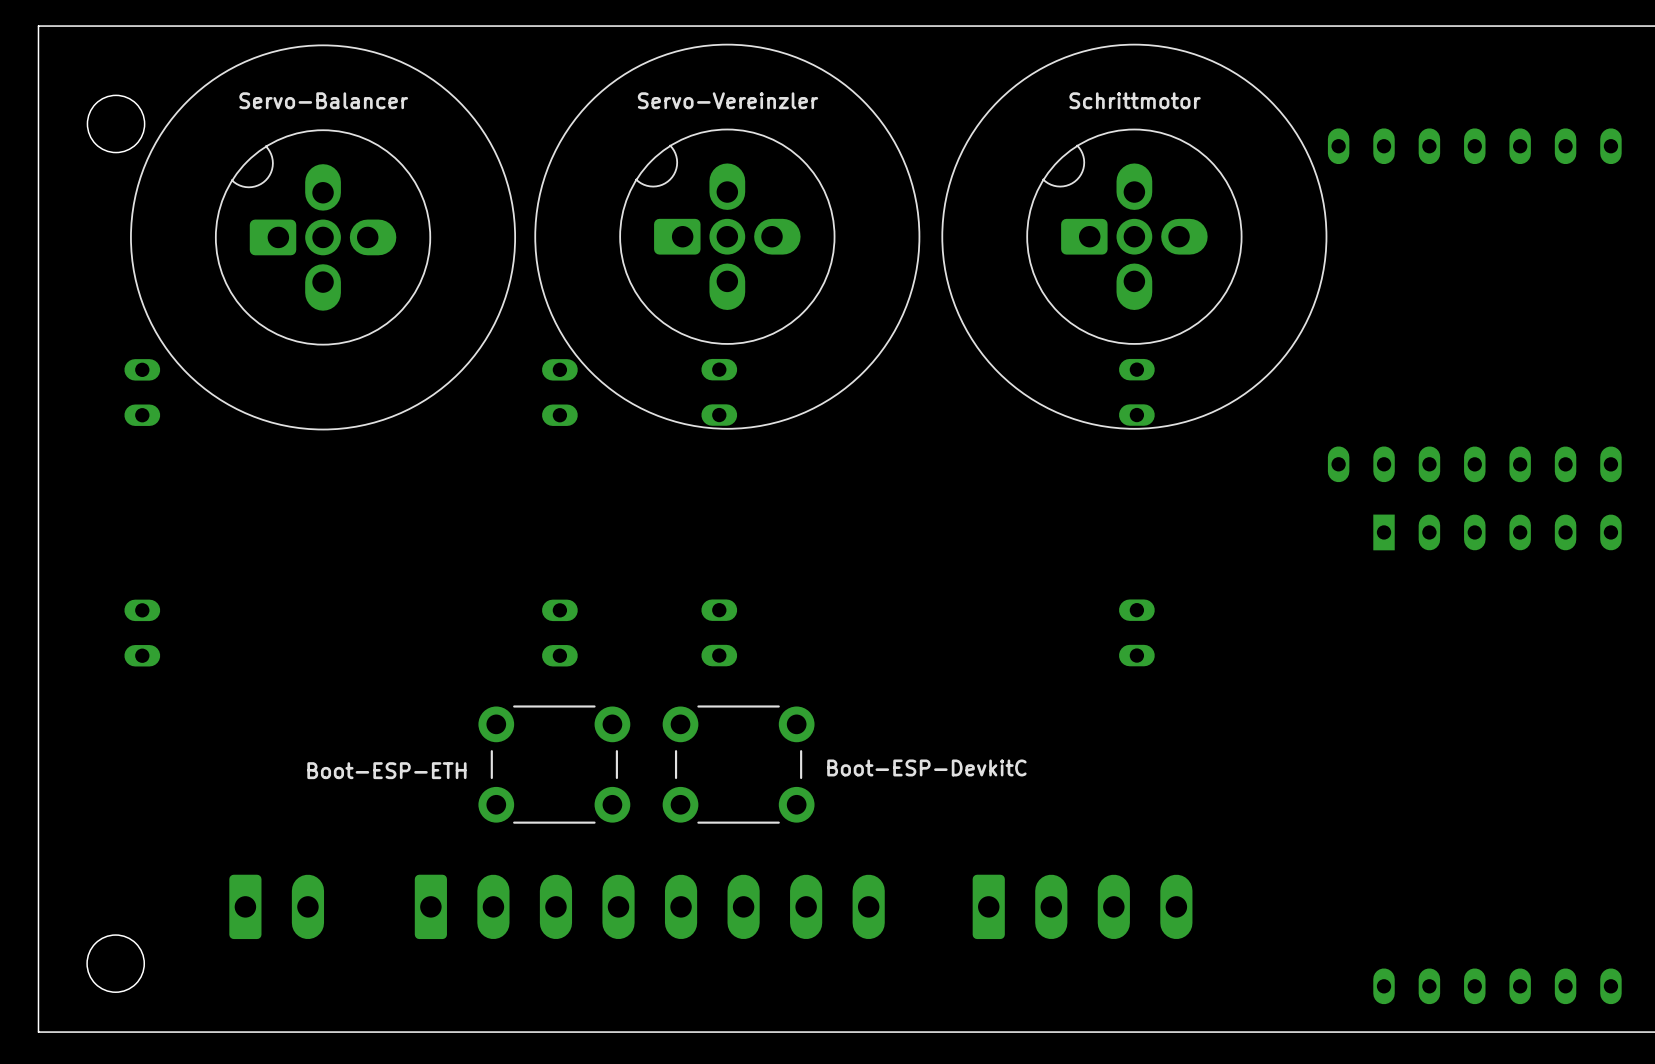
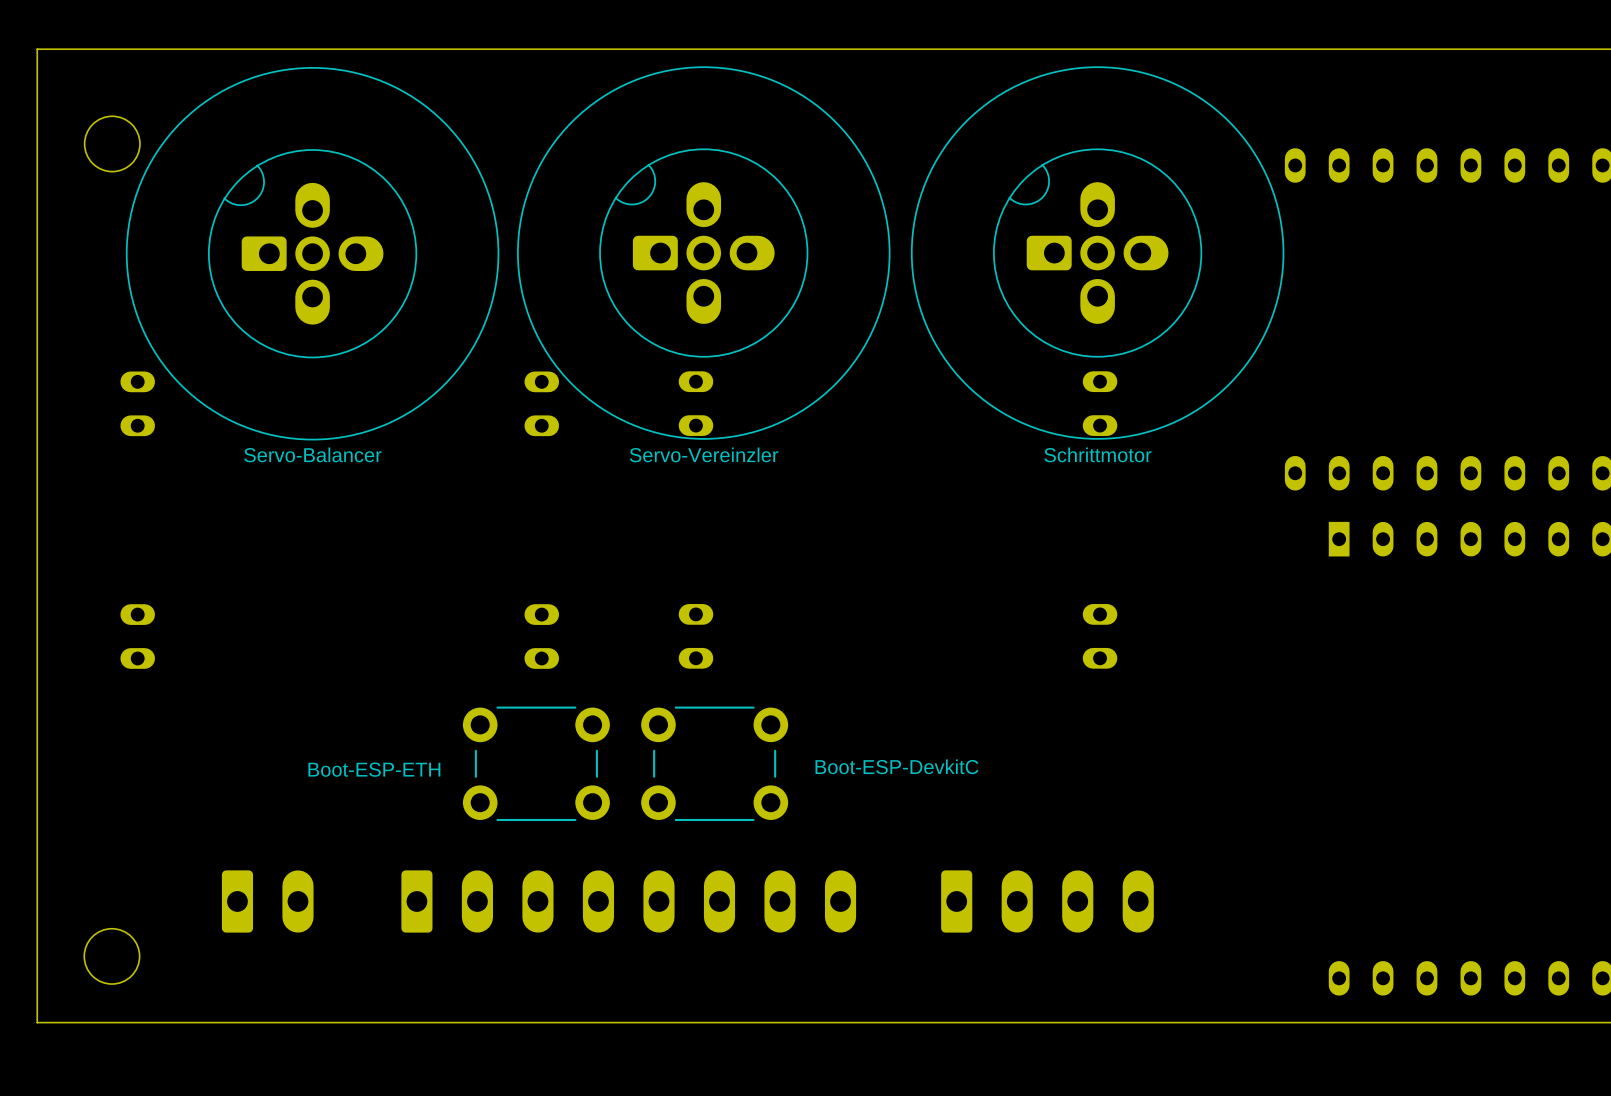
part value position: Servo-Balancer (323, 100) -> Servo-Balancer (312, 454)
part value position: Servo-Vereinzler (728, 100) -> Servo-Vereinzler (704, 454)
part value position: Schrittmotor (1135, 100) -> Schrittmotor (1097, 454)

